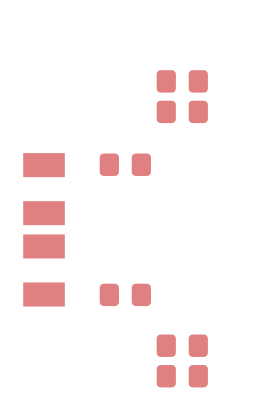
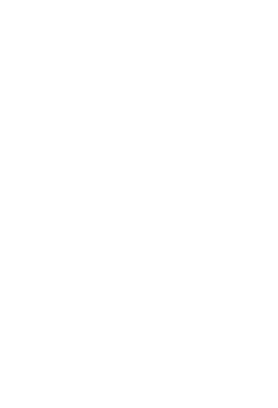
part: (182, 81) -> none
part: (182, 111) -> none
part: (125, 164) -> none
part: (44, 189) -> none
part: (44, 270) -> none
part: (125, 294) -> none
part: (182, 345) -> none
part: (182, 376) -> none

